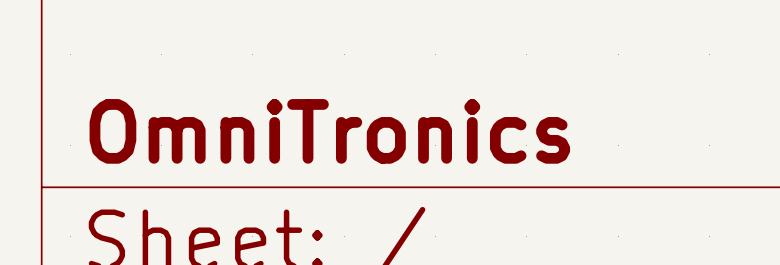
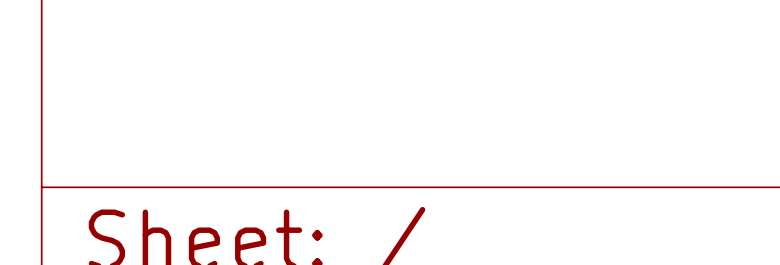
title block: OmniTronics (329, 131) -> none

